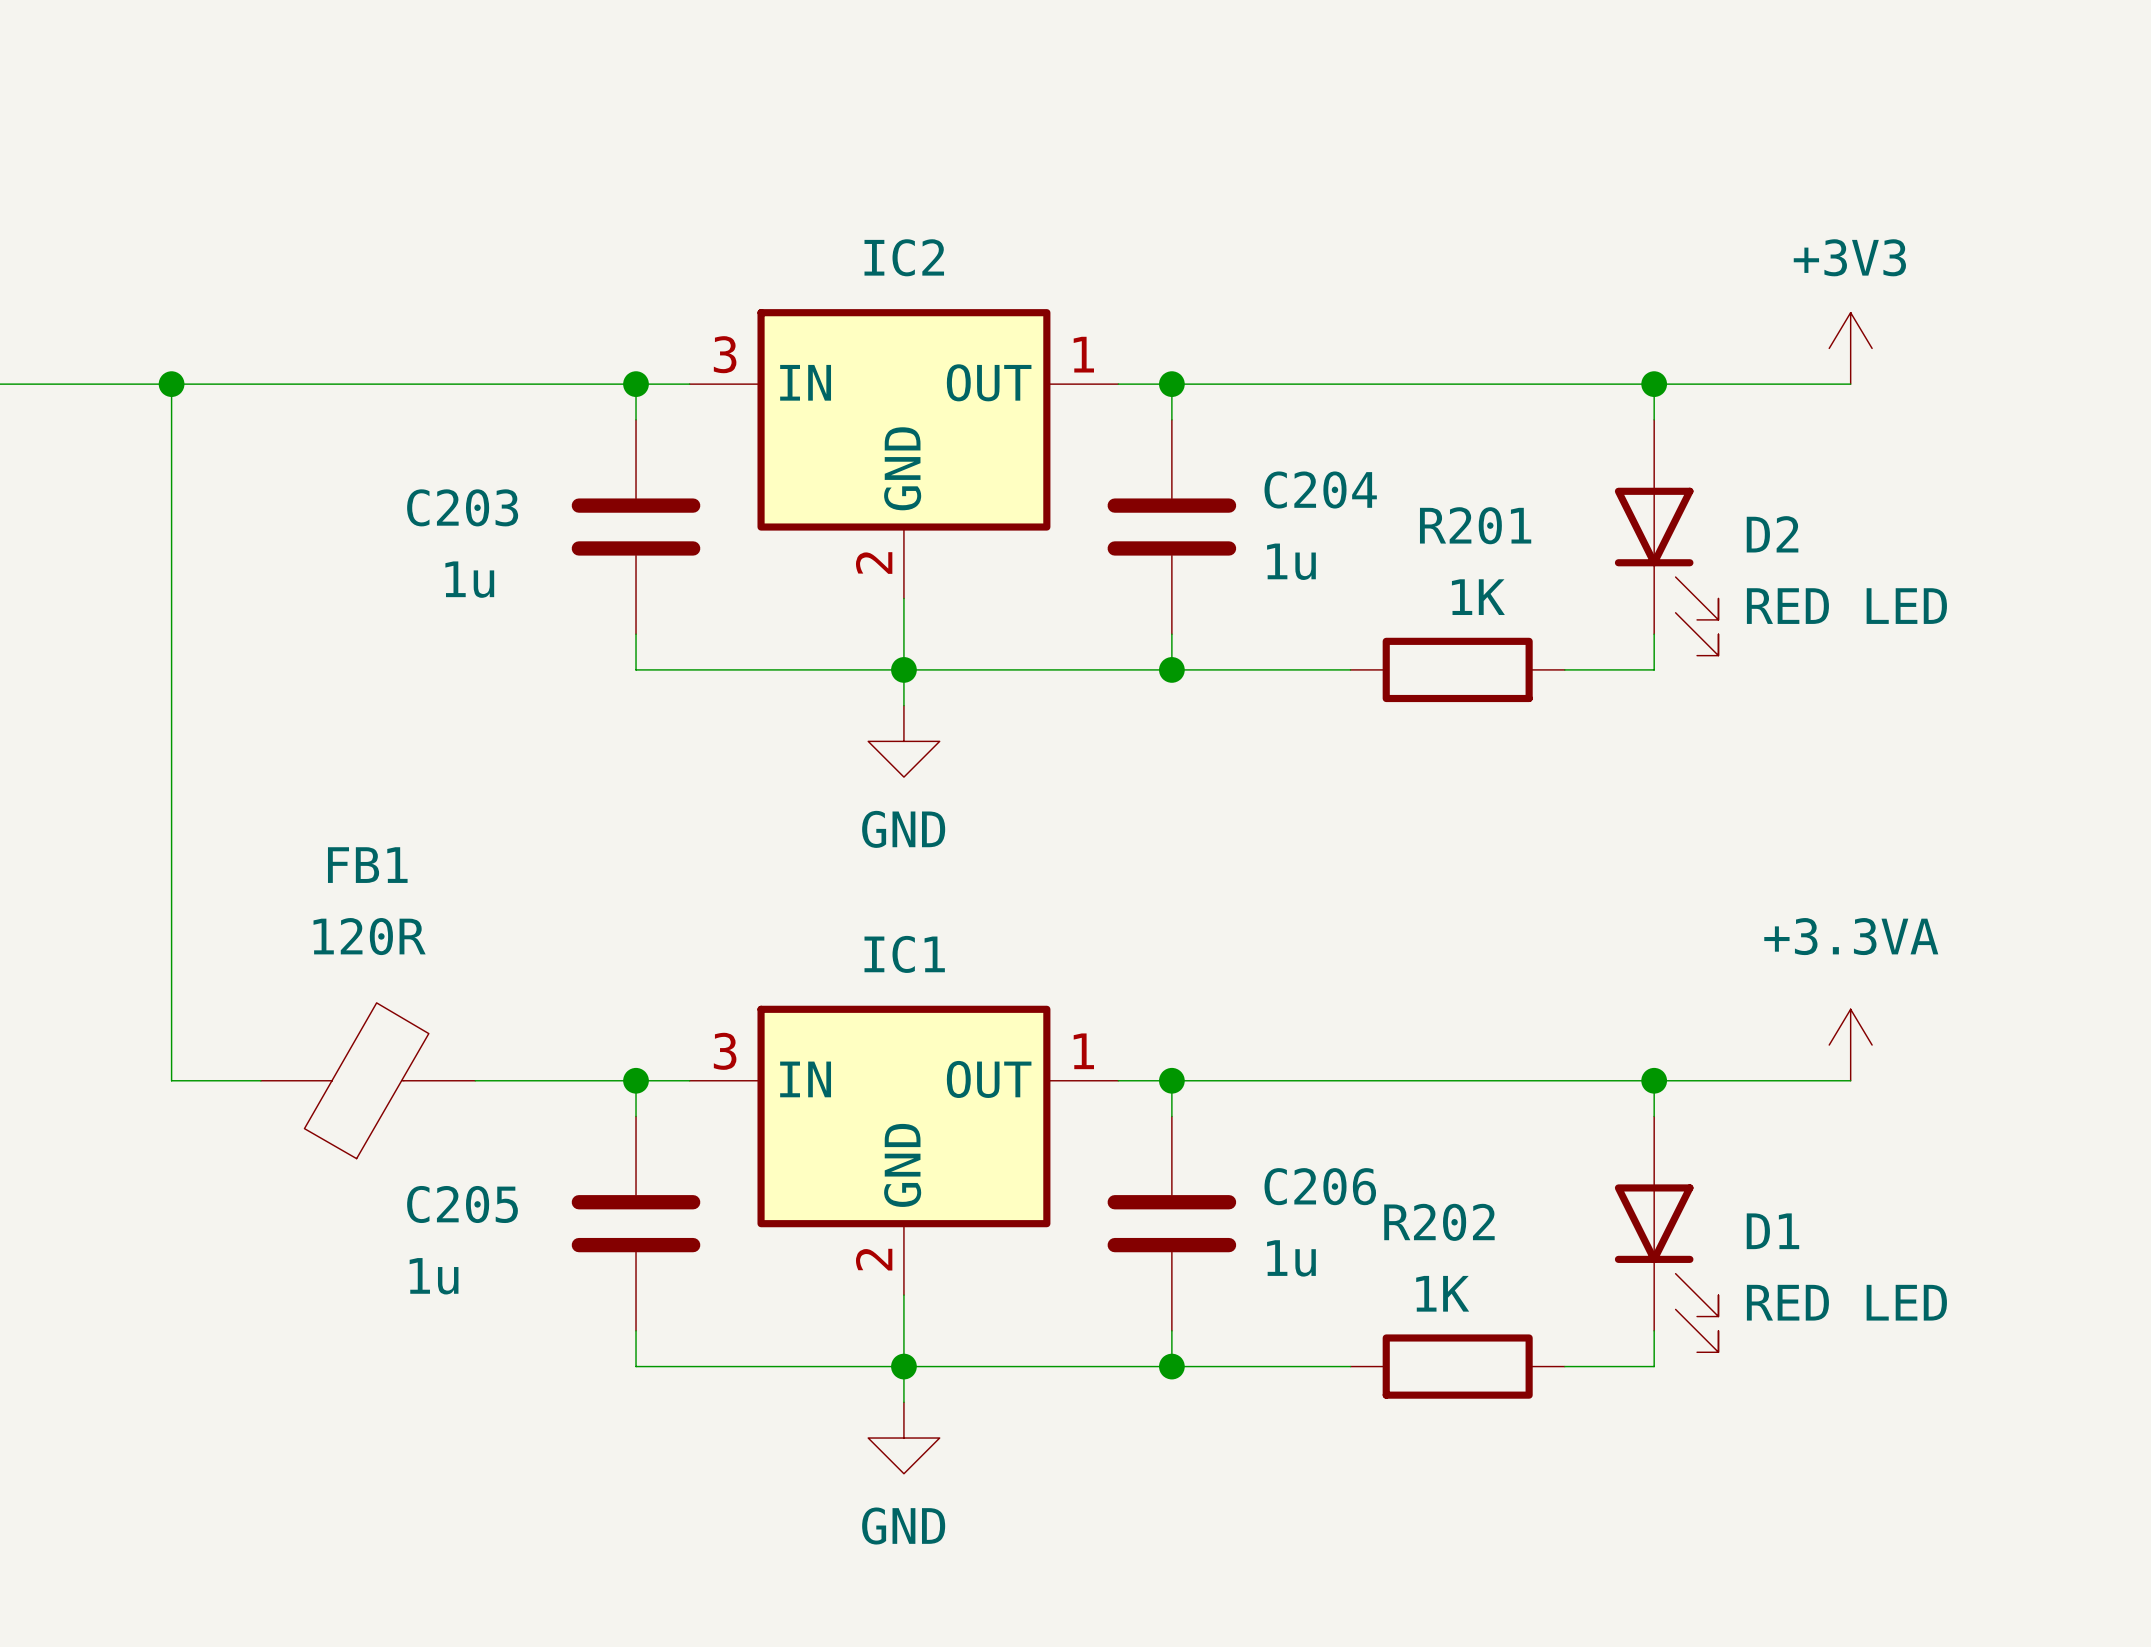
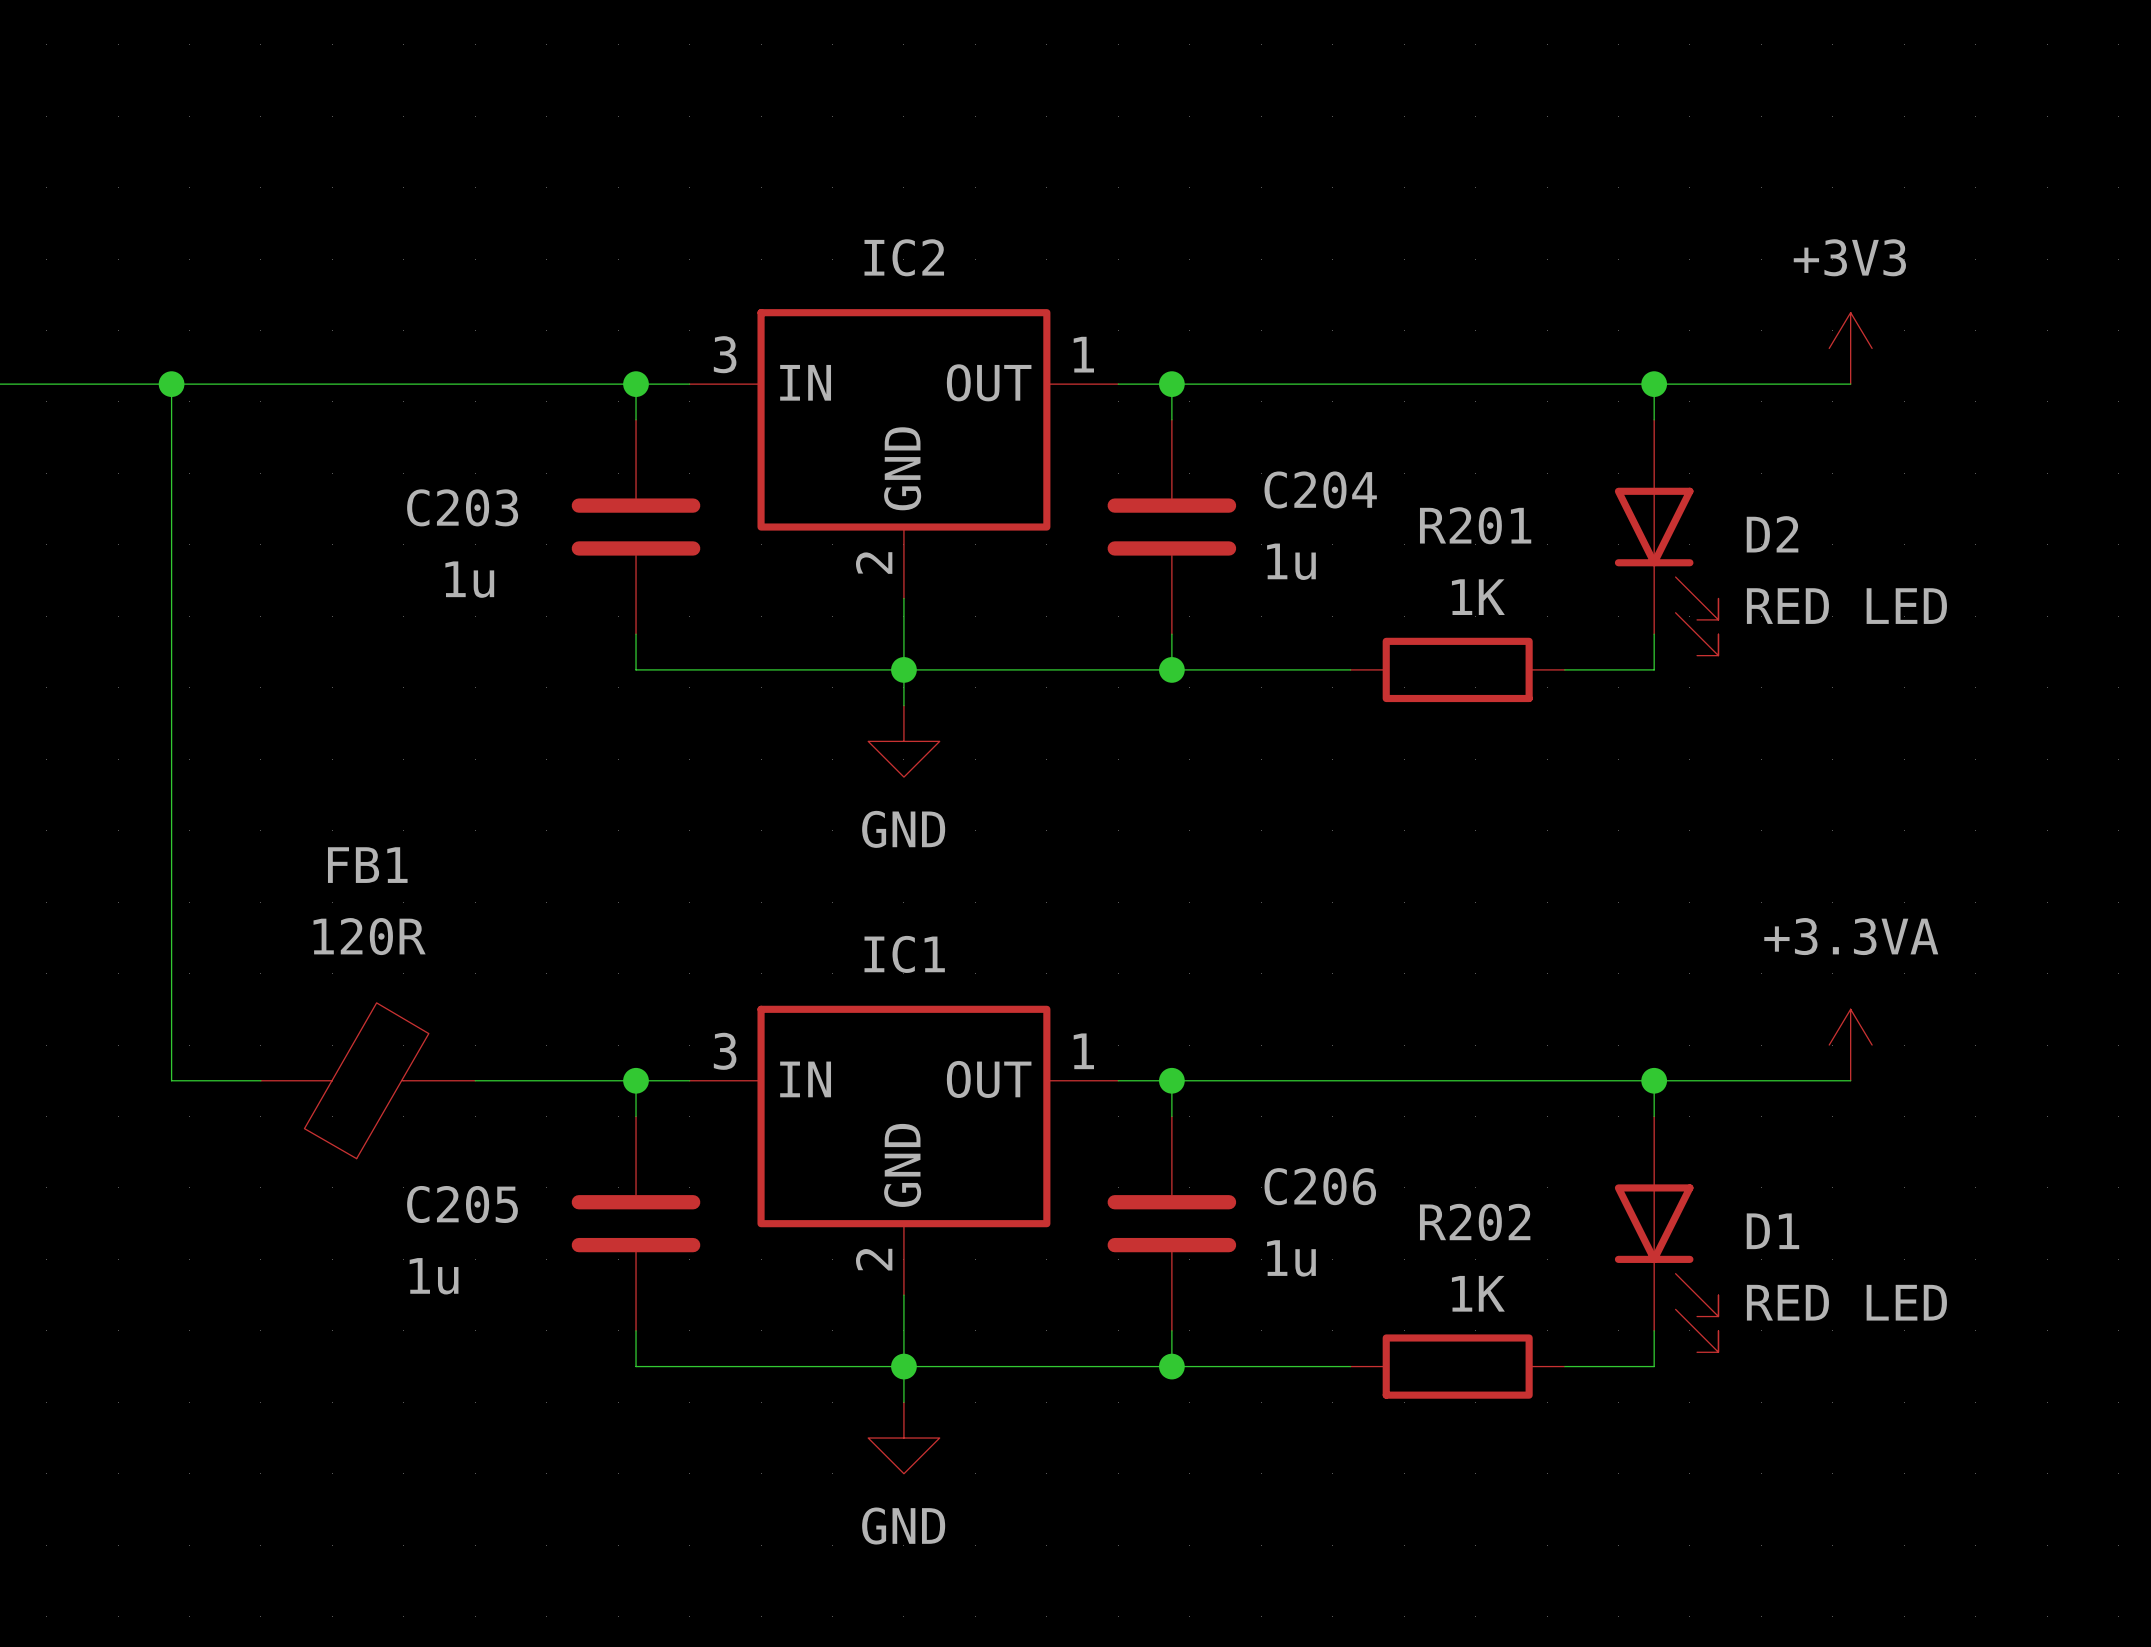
R202 name position: R202 (1439, 1222) -> R202 (1475, 1222)
R202 value position: 1K (1442, 1293) -> 1K (1478, 1293)

